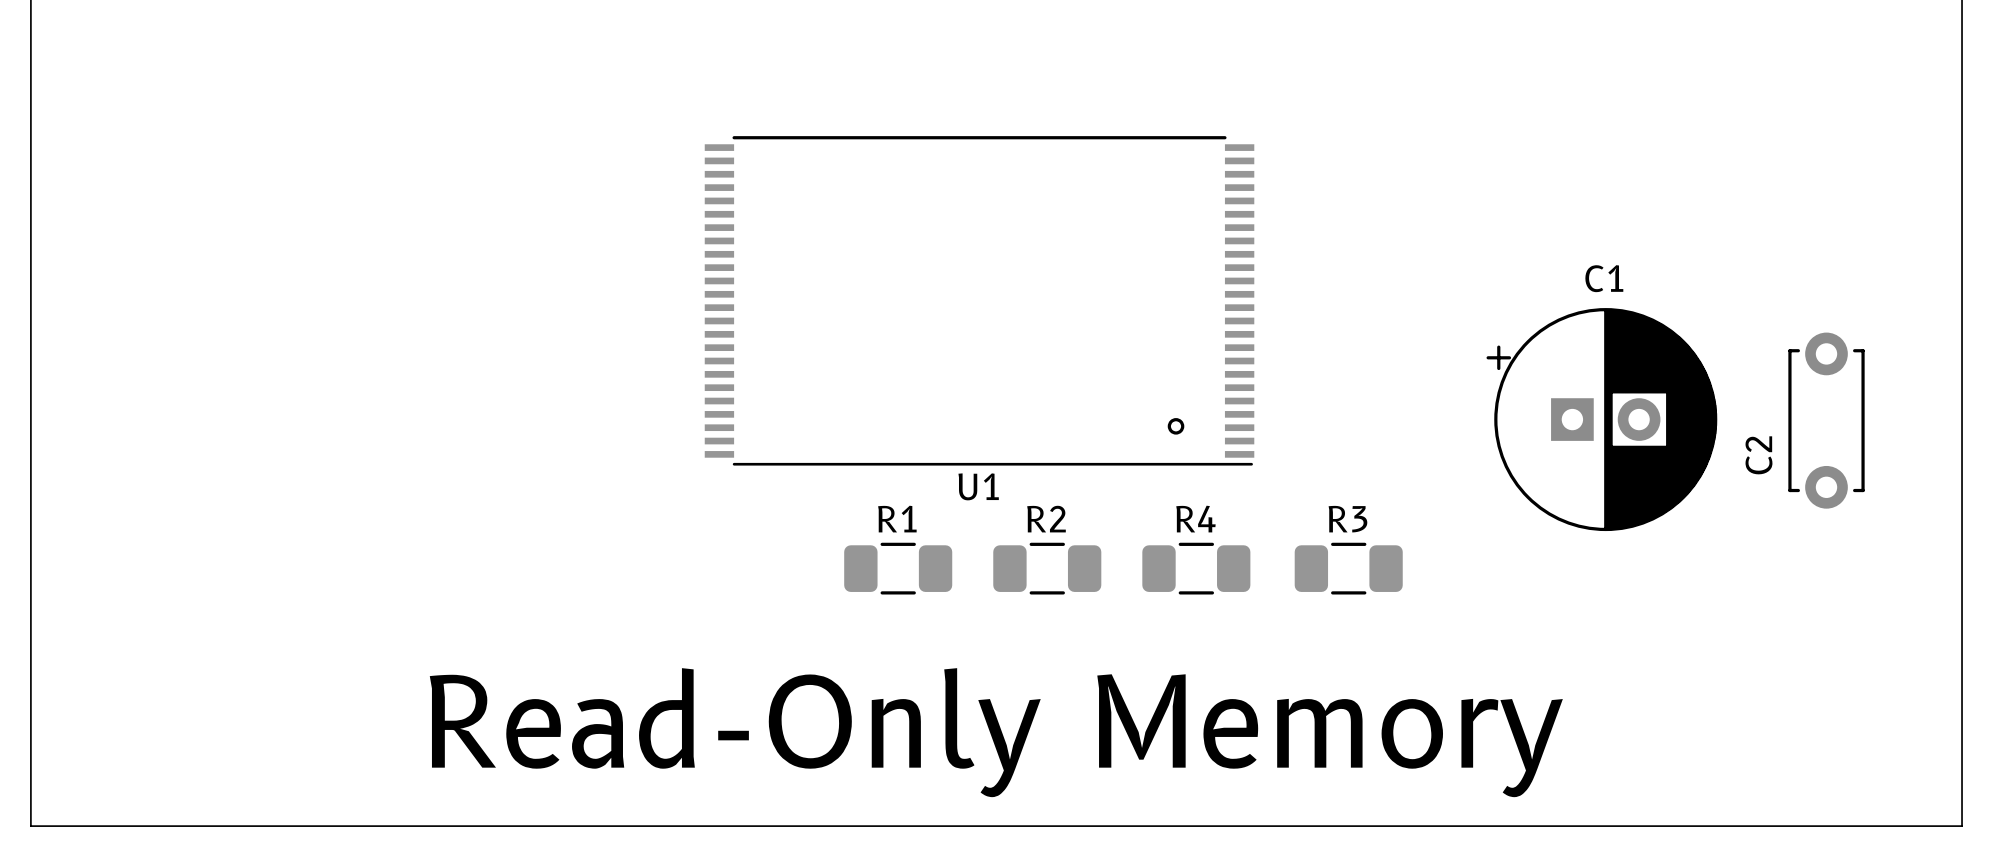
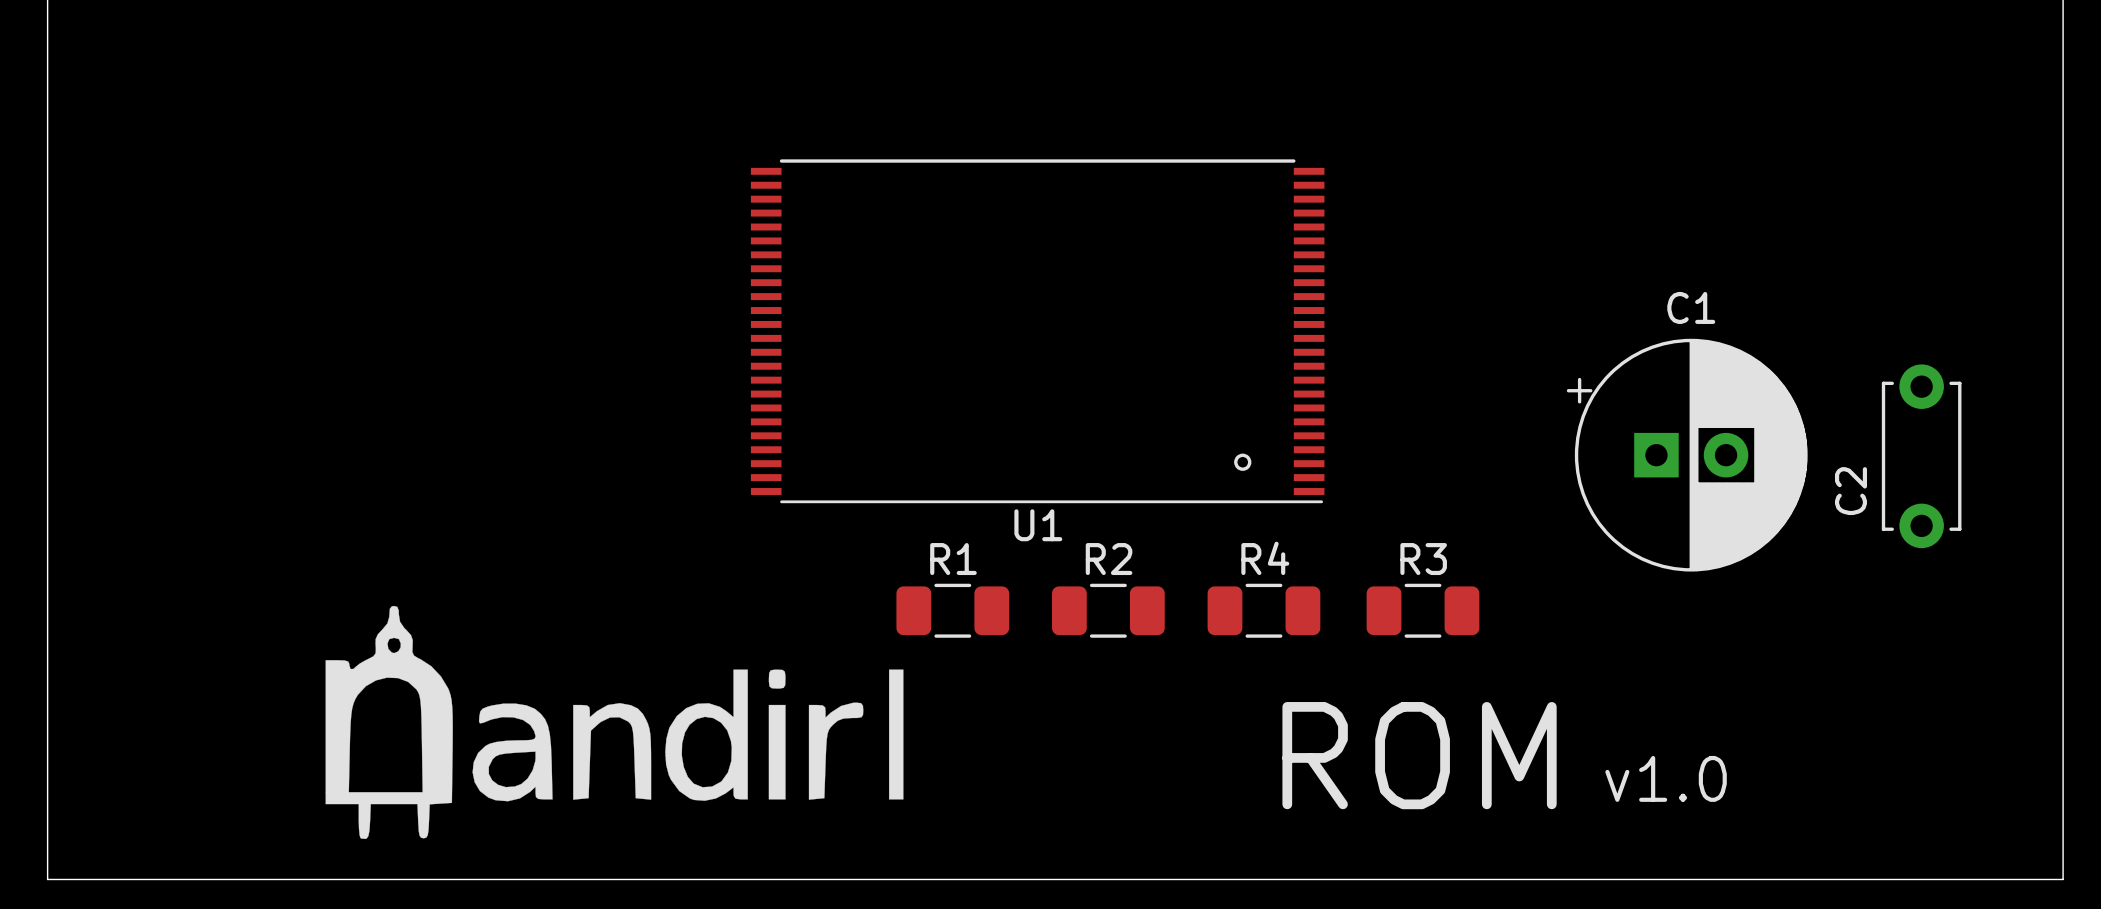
drawing: none -> [325, 605, 904, 840]
text: none -> ROM (1419, 755)
text: none -> v1.0 (1666, 778)
text: Read-Only Memory (996, 732) -> none

